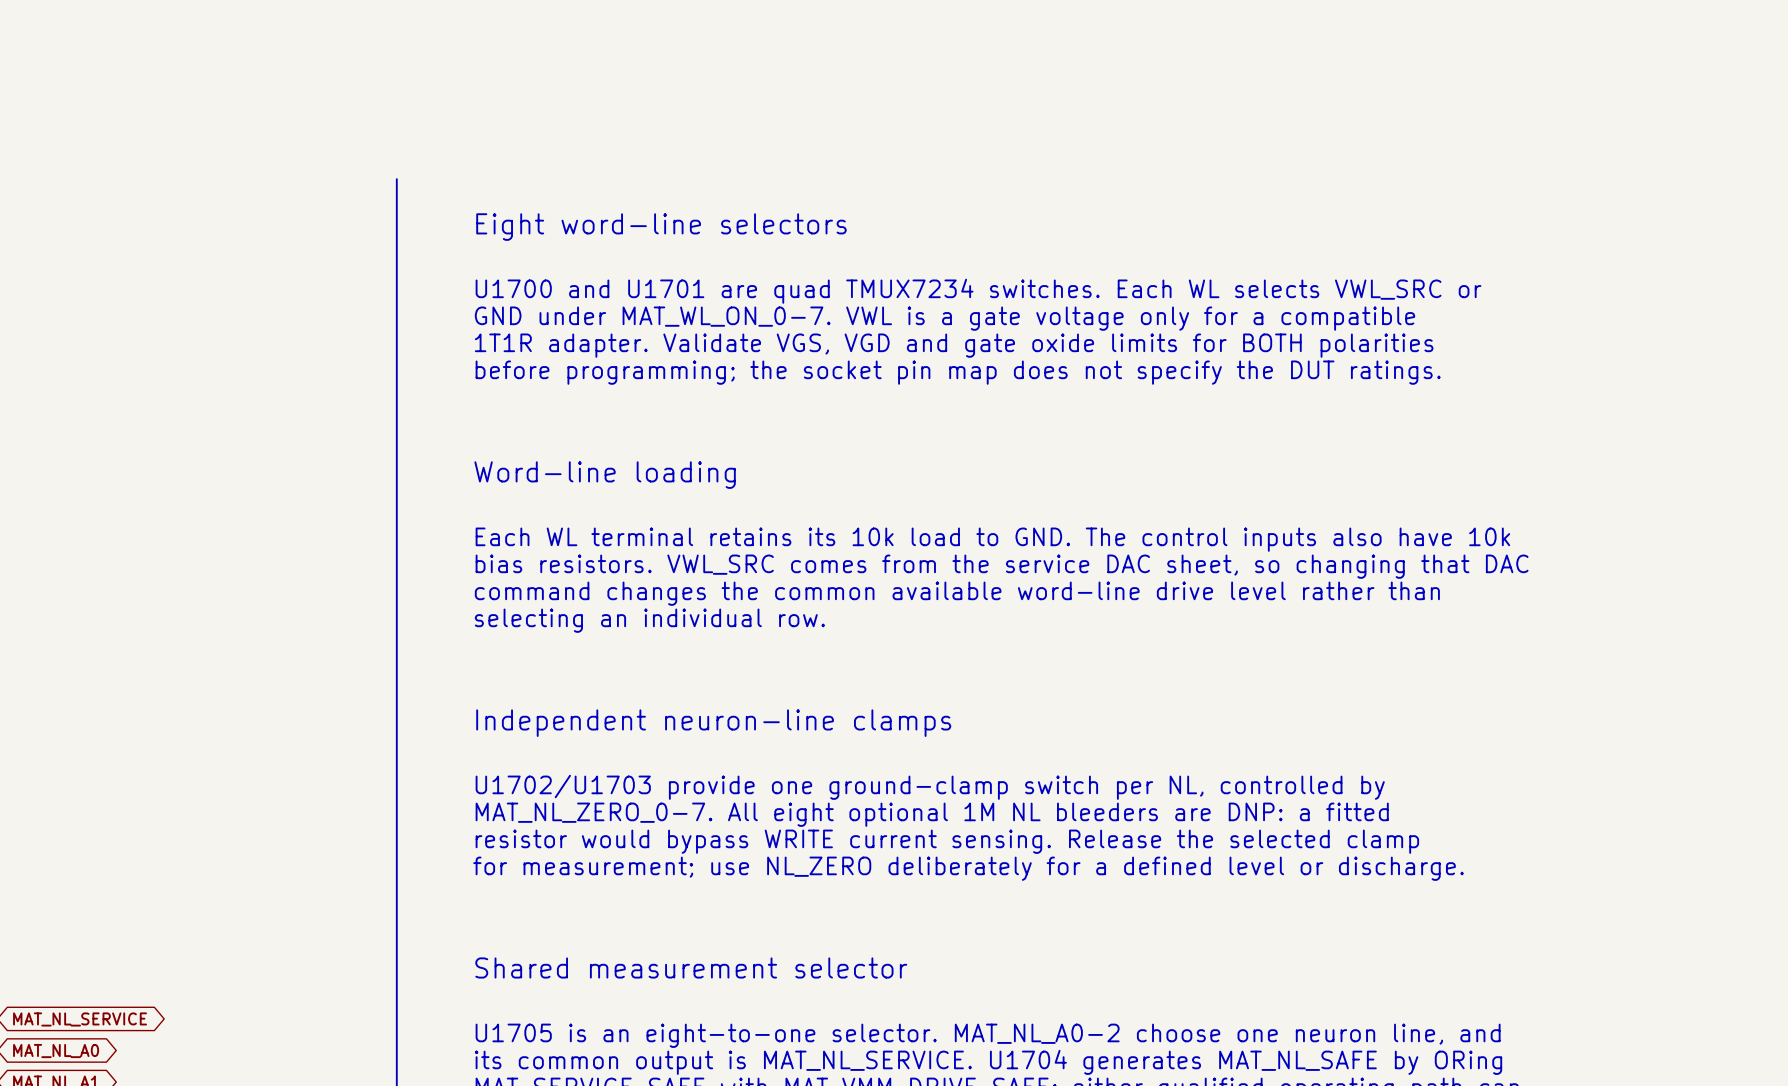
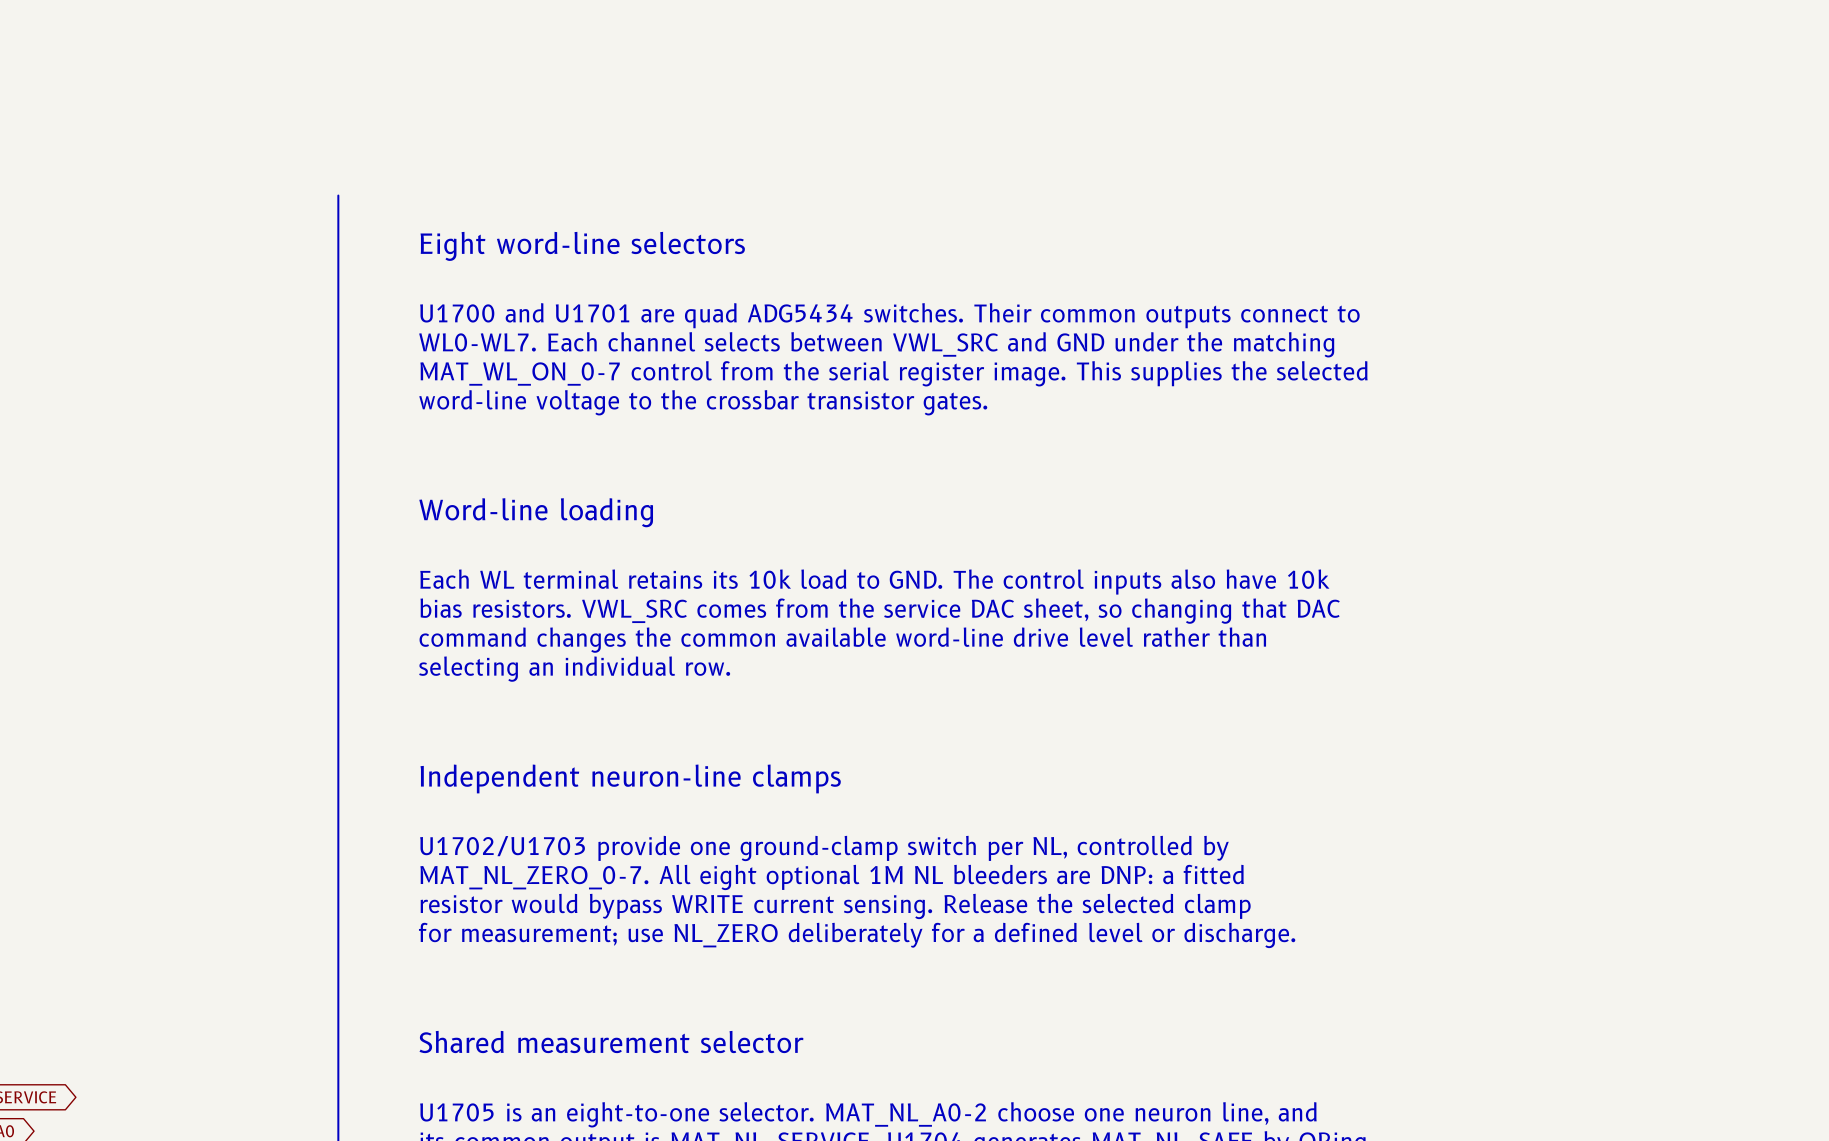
text: U1700 and U1701 are quad TMUX7234 switches. Each WL selects VWL_SRC or (978, 291) -> U1700 and U1701 are quad ADG5434 switches. Their common outputs connect to (889, 315)
text: GND under MAT_WL_ON_0-7. VWL is a gate voltage only for a compatible (944, 318) -> WL0-WL7. Each channel selects between VWL_SRC and GND under the matching (876, 344)
text: 1T1R adapter. Validate VGS, VGD and gate oxide limits for BOTH polarities (954, 345) -> MAT_WL_ON_0-7 control from the serial register image. This supplies the selected (894, 373)
text: before programming; the socket pin map does not specify the DUT ratings. (958, 372) -> word-line voltage to the crossbar transistor gates. (703, 402)

